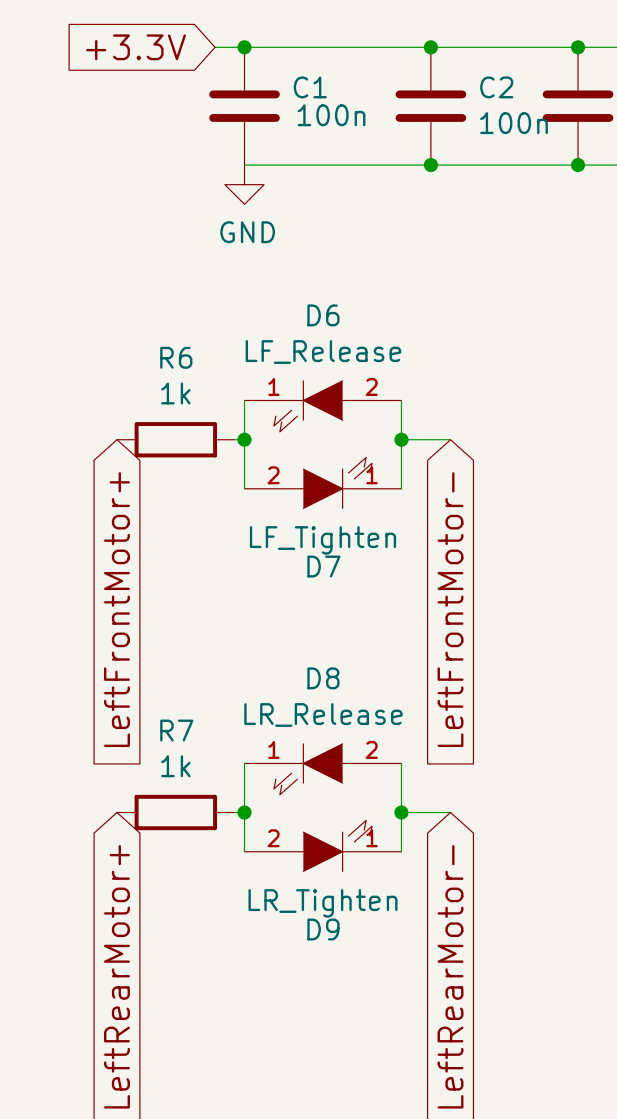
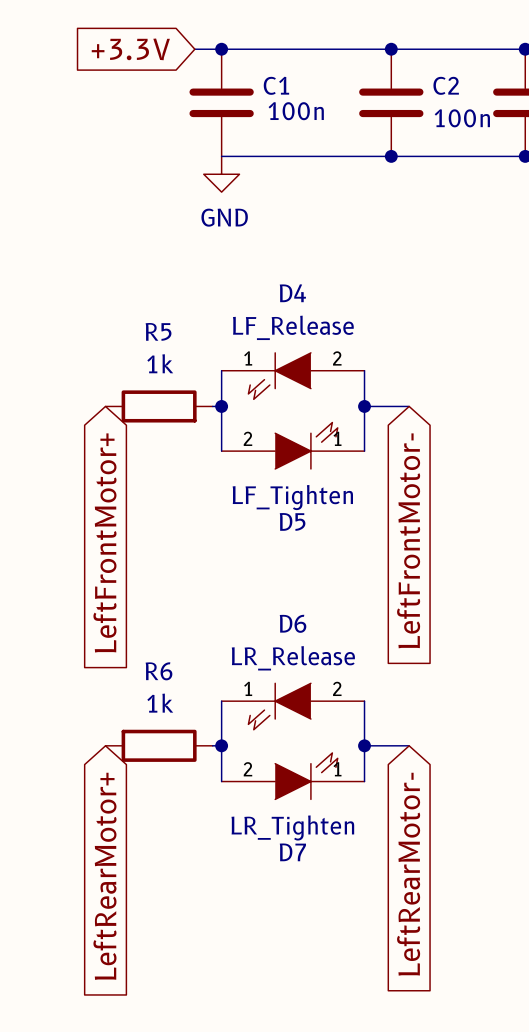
D6 name: D6 (323, 315) -> D4 (292, 293)
R6 name: R6 (176, 357) -> R5 (158, 331)
D7 name: D7 (323, 566) -> D5 (292, 521)
D8 name: D8 (323, 678) -> D6 (293, 623)
R7 name: R7 (176, 730) -> R6 (159, 671)
D9 name: D9 (323, 929) -> D7 (292, 852)

